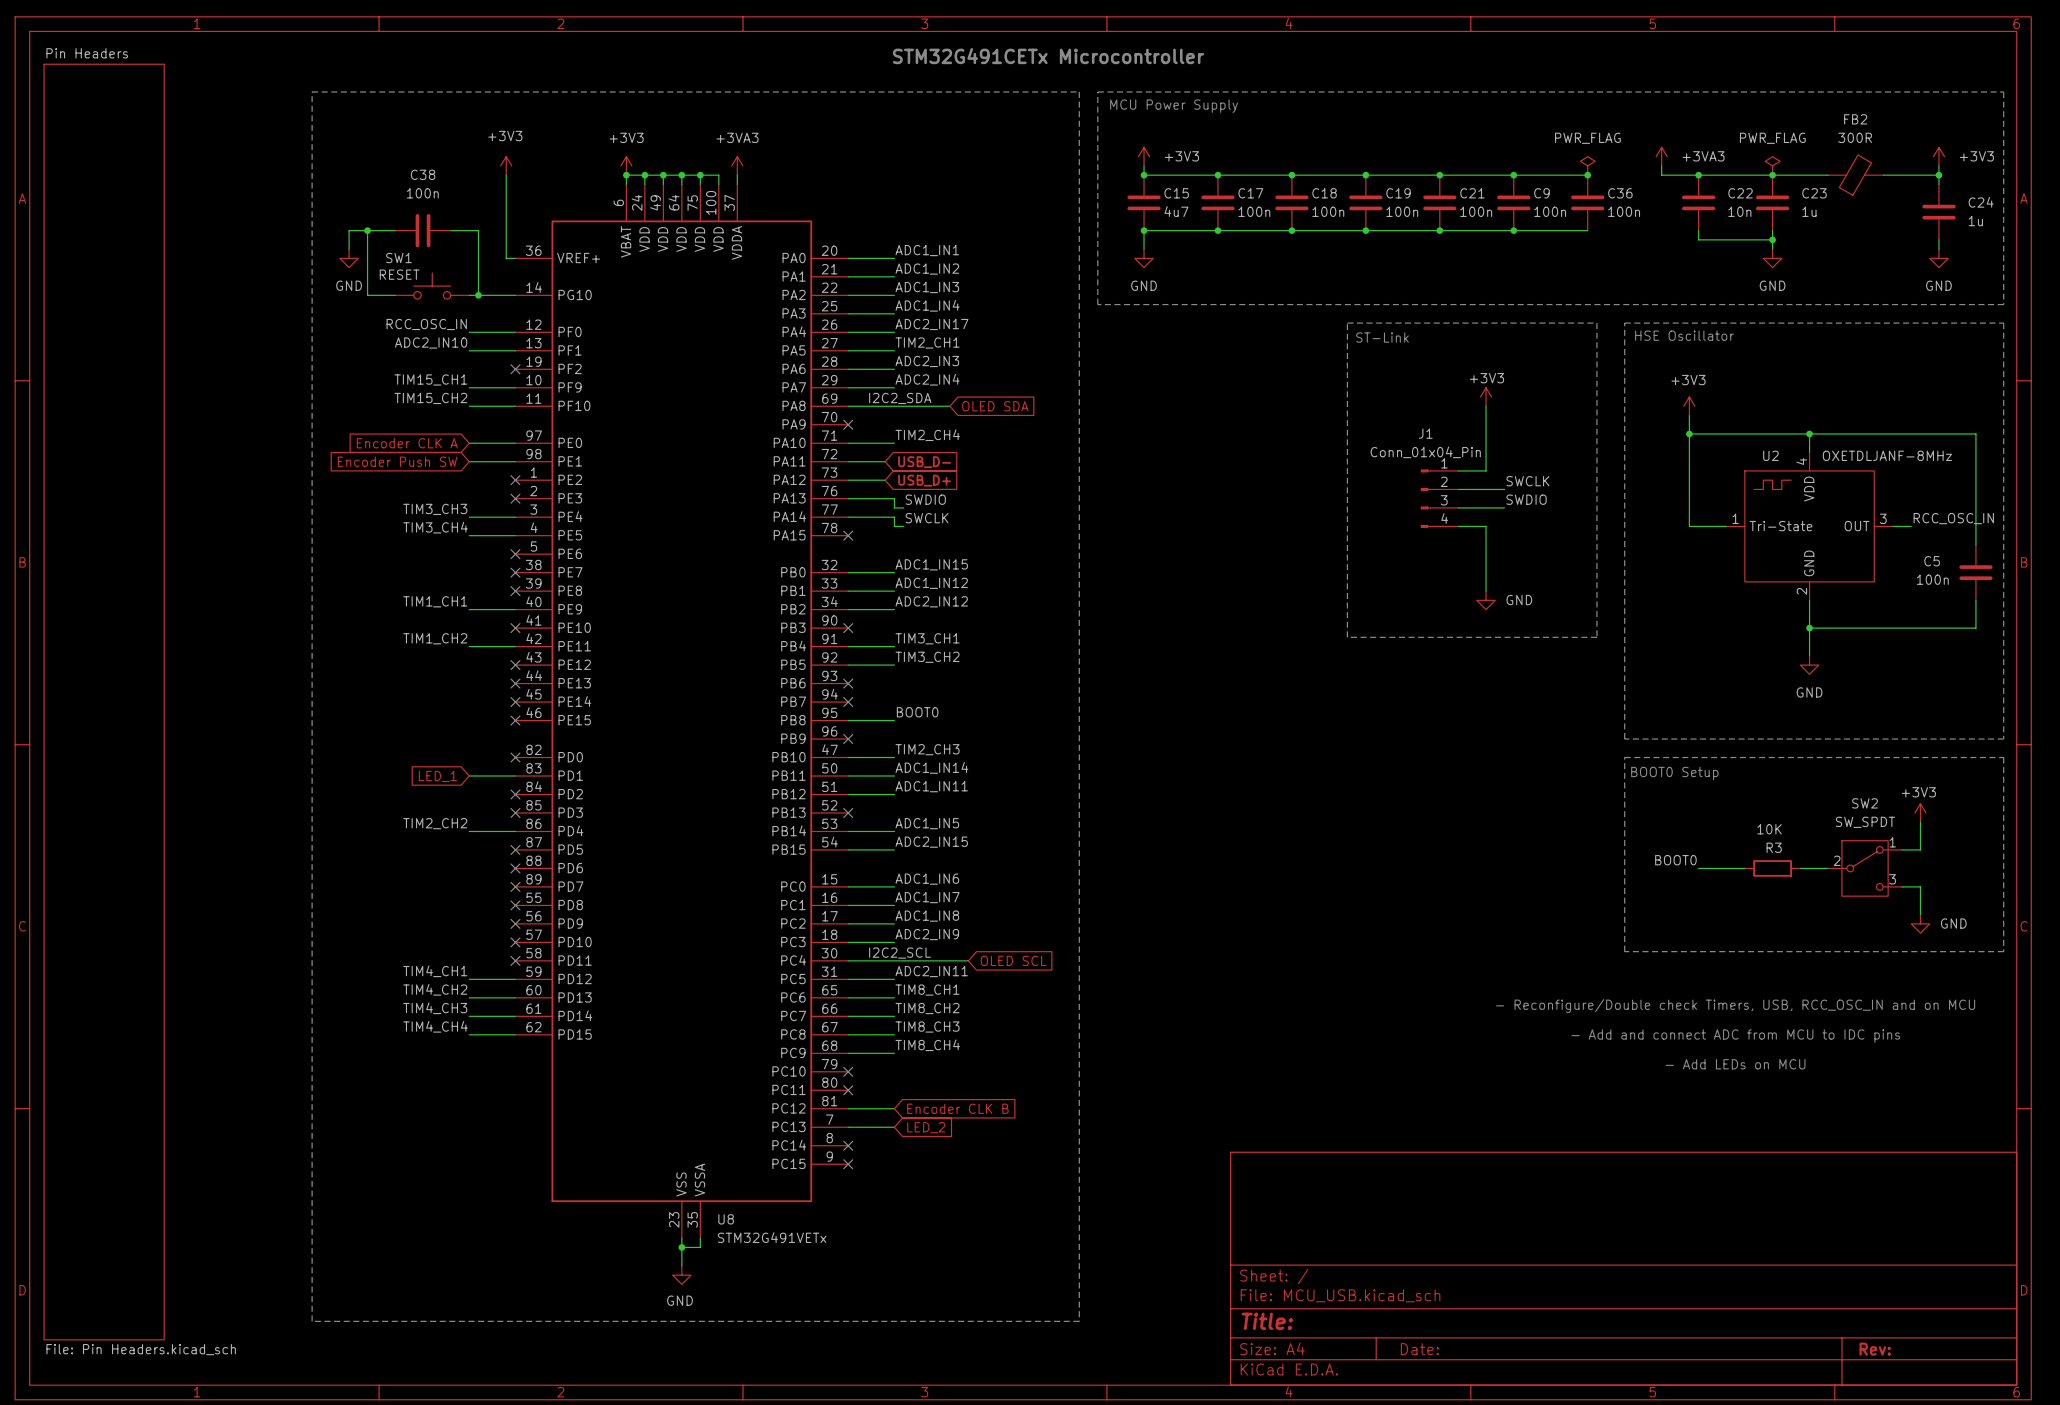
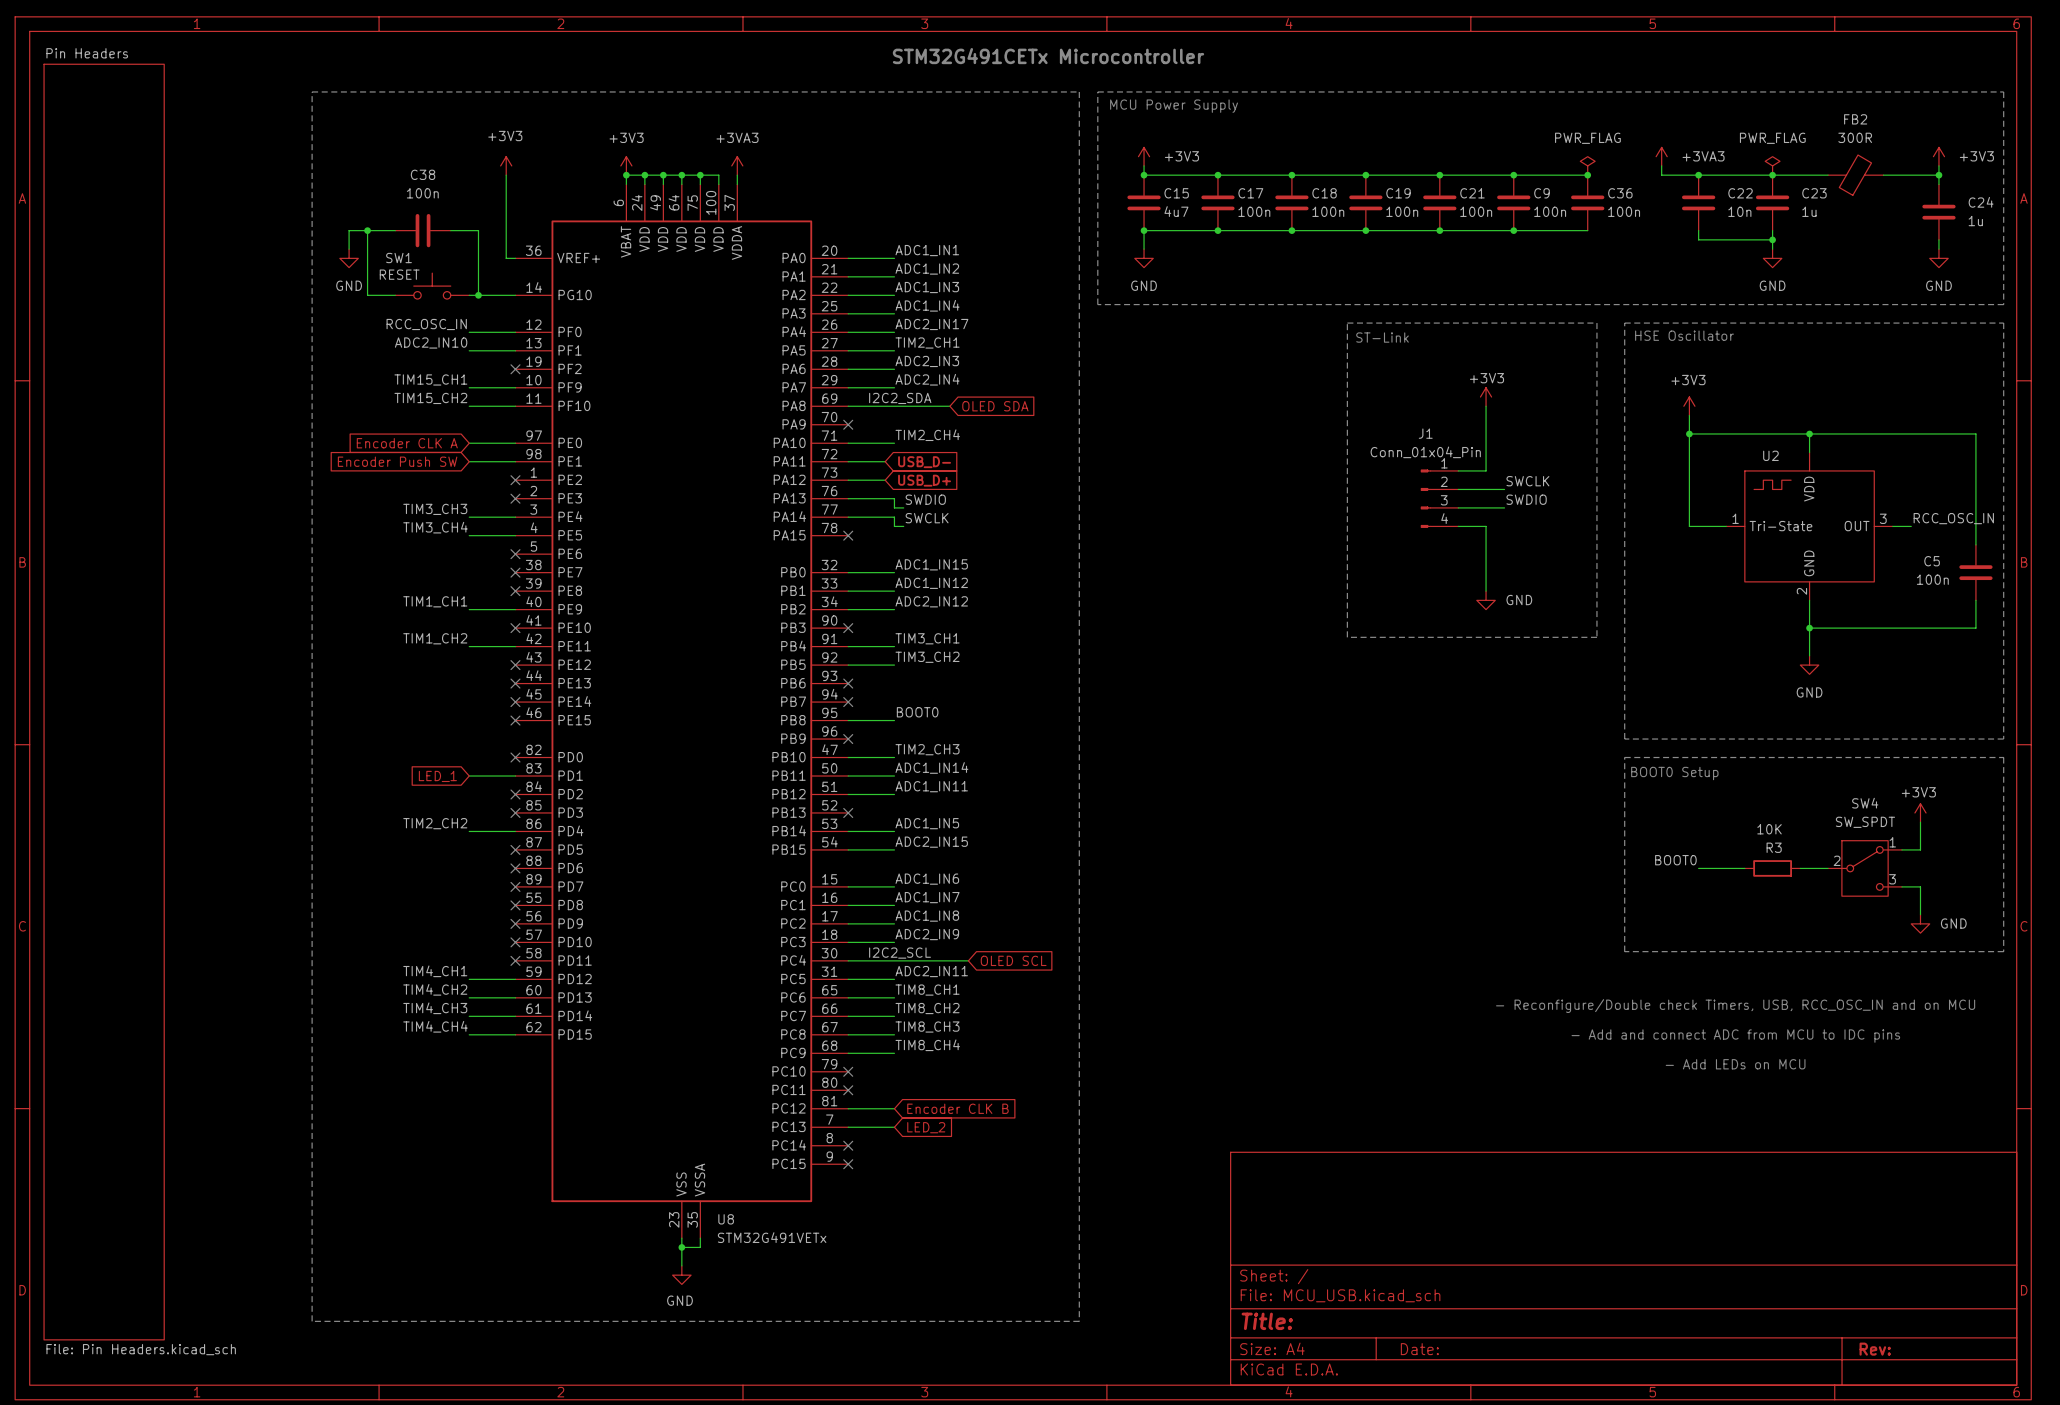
U2 value: OXETDLJANF-8MHz (1887, 455) -> none
U2 pin number: 4 (1801, 461) -> none
SW2 name: SW2 (1865, 803) -> SW4 (1865, 803)

